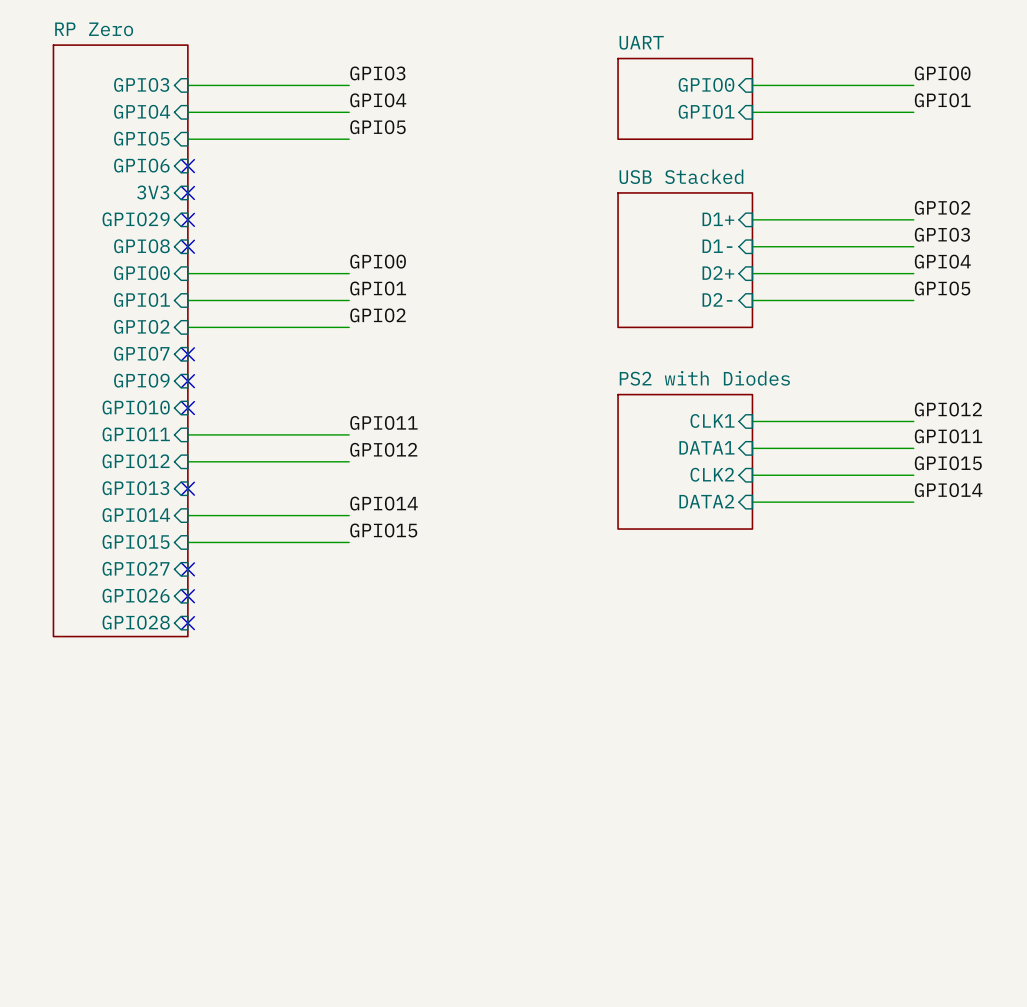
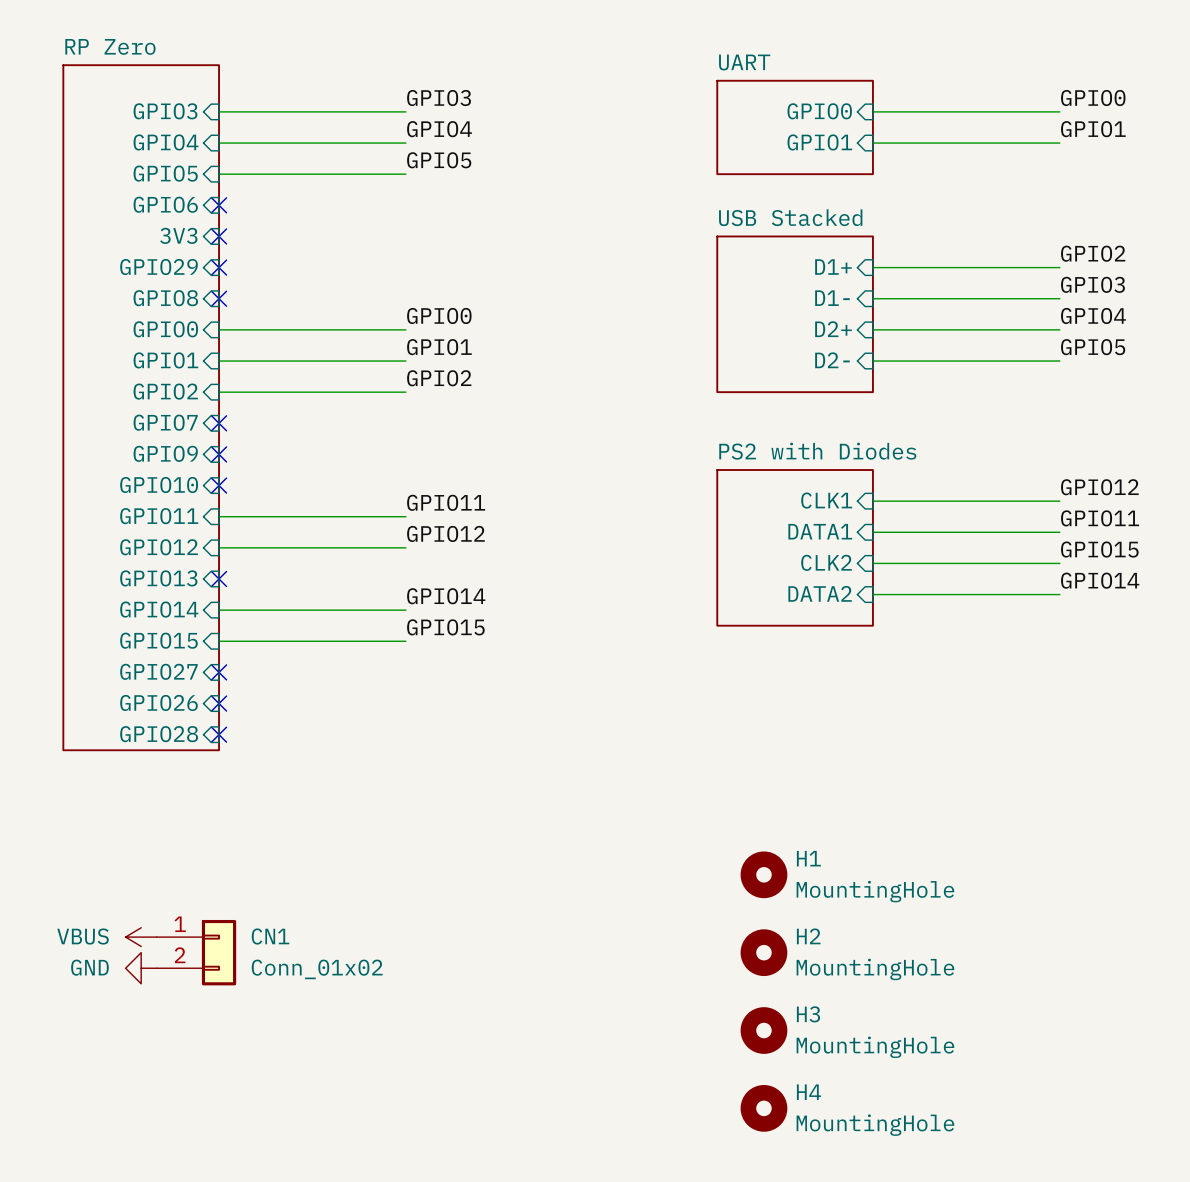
H1: none -> MountingHole (763, 874)
power symbol: none -> VBUS (141, 937)
CN1: none -> Conn_01x02 (196, 952)
H2: none -> MountingHole (763, 952)
power symbol: none -> GND (141, 968)
H3: none -> MountingHole (763, 1030)
H4: none -> MountingHole (763, 1108)

